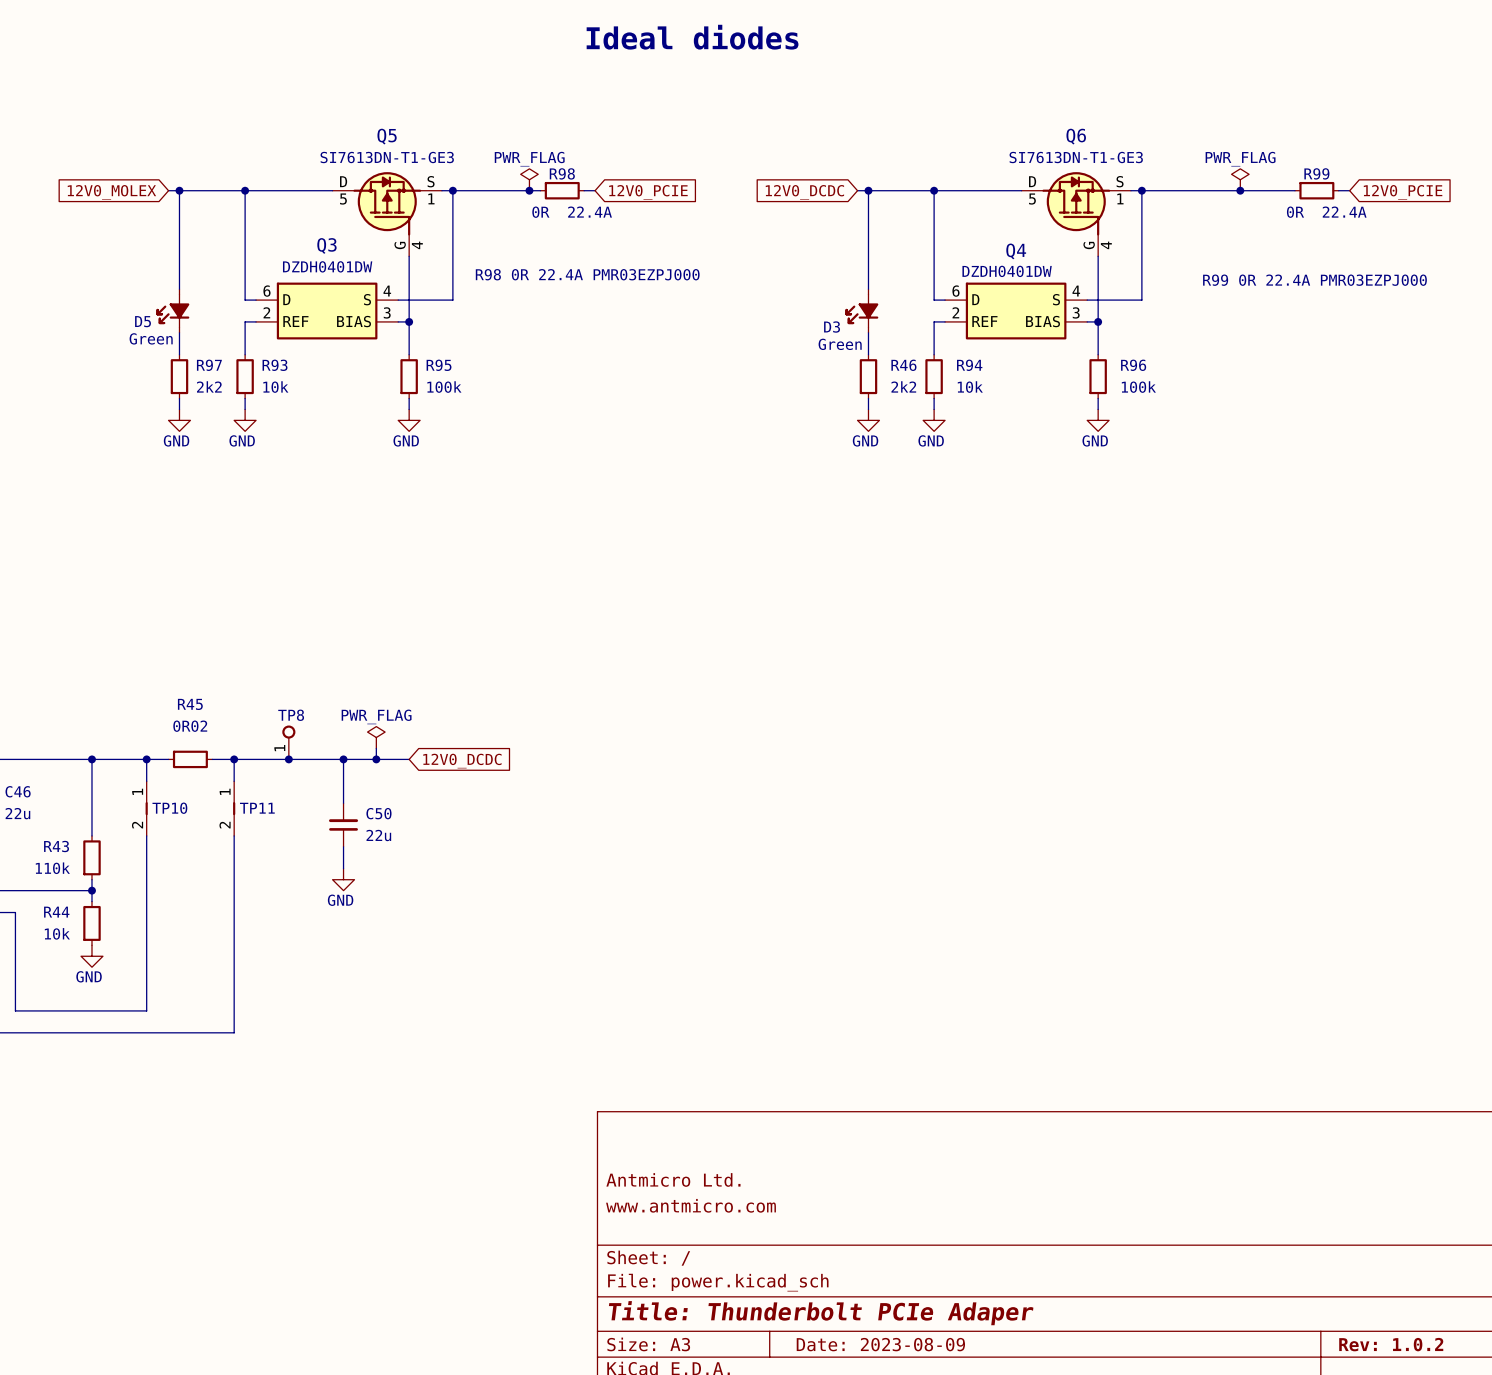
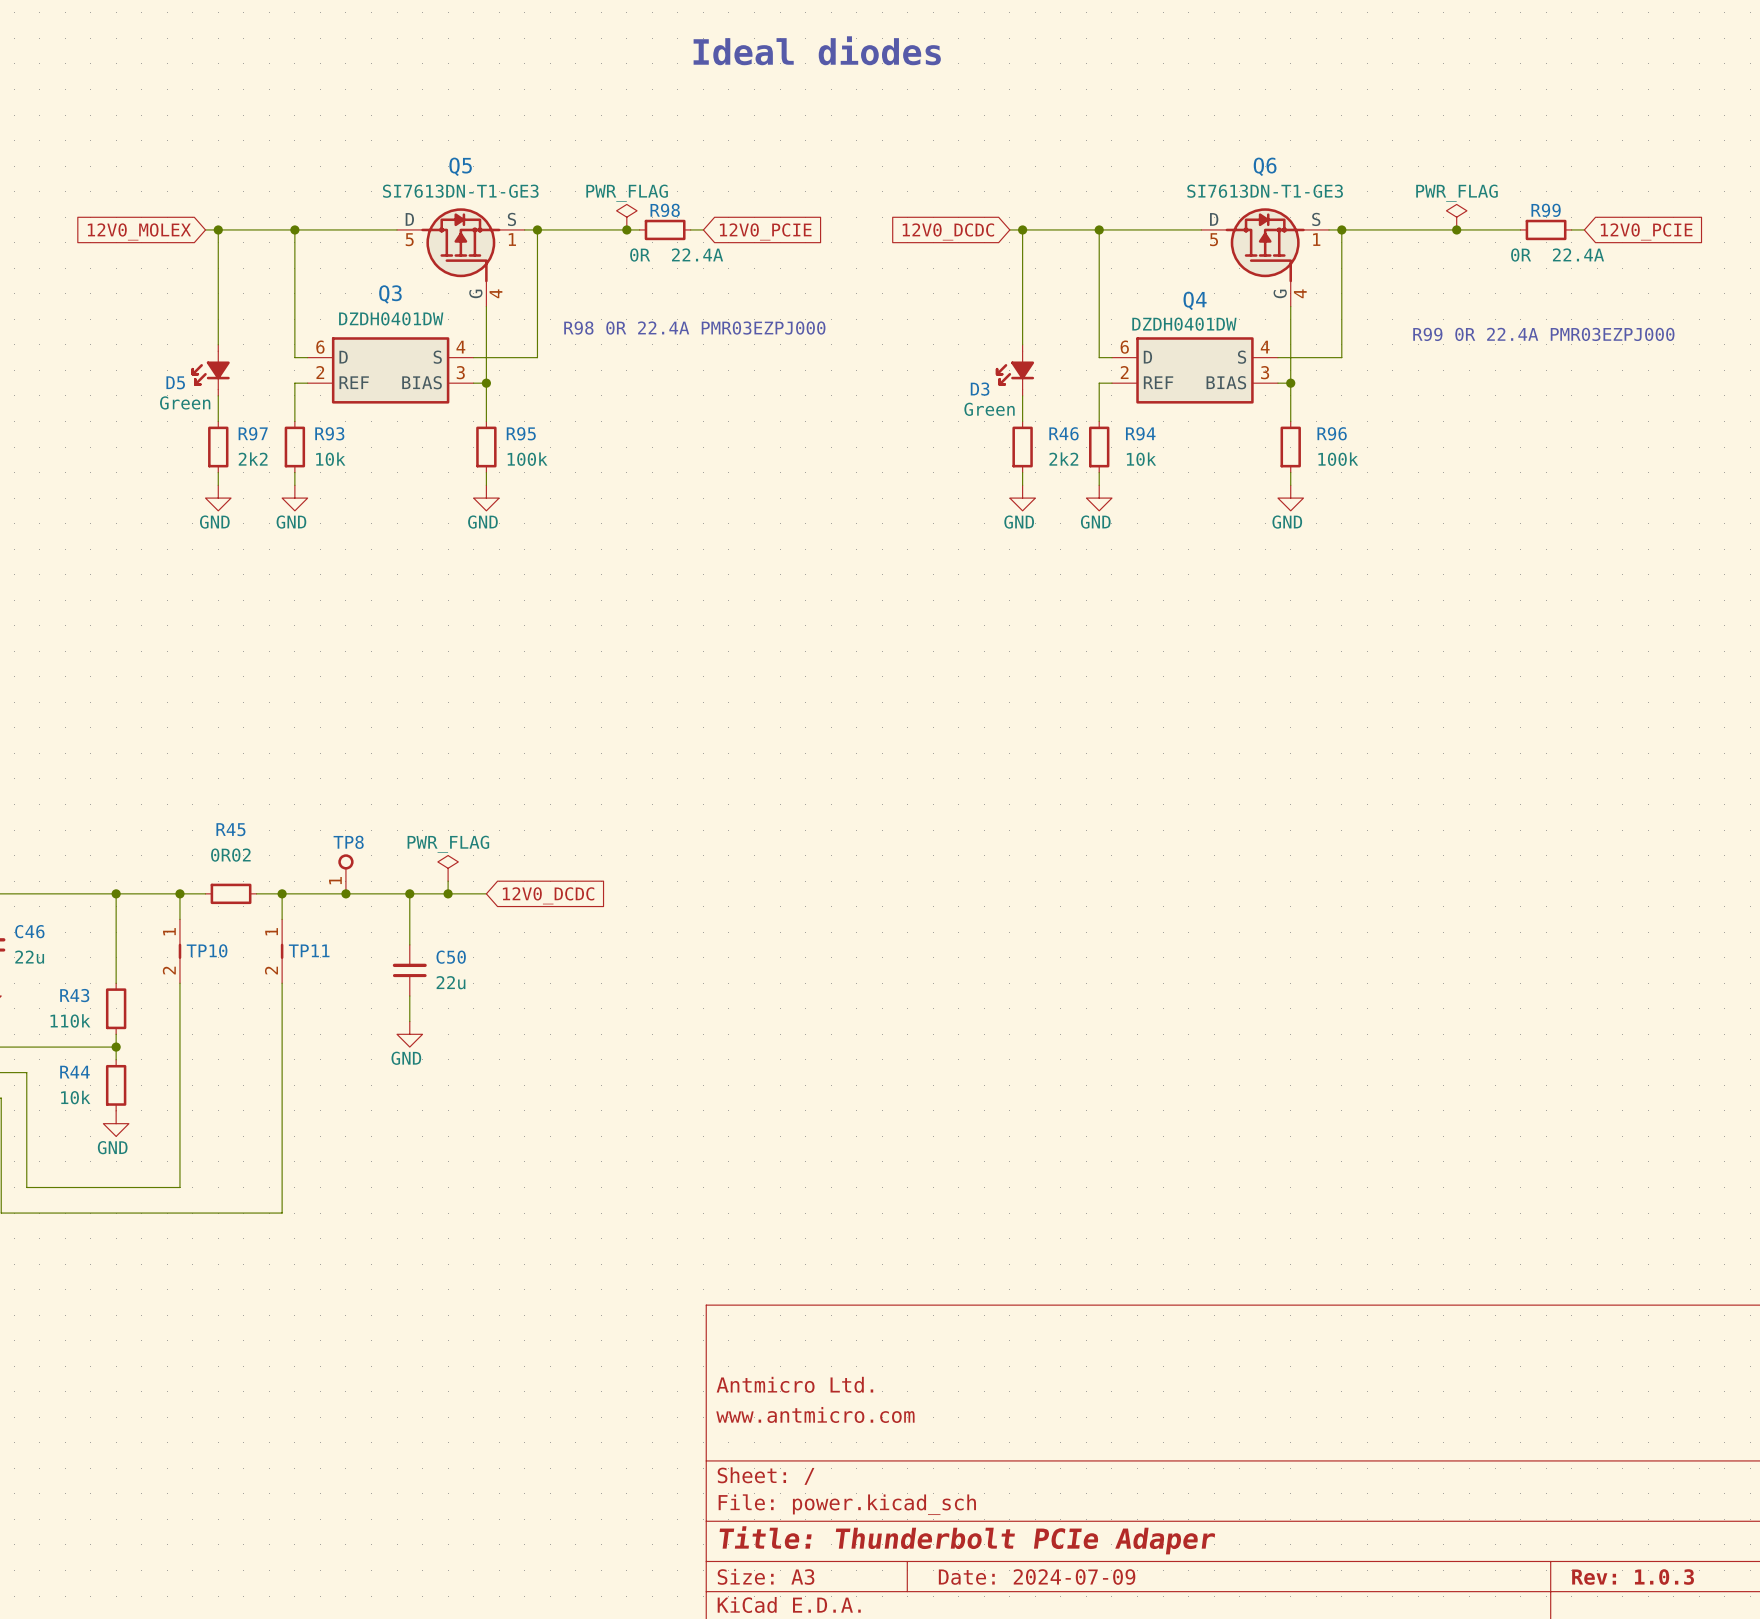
title block: Date: 2023-08-09 (880, 1344) -> Date: 2024-07-09 (1037, 1577)
title block: Rev: 1.0.2 (1391, 1344) -> Rev: 1.0.3 (1633, 1577)

